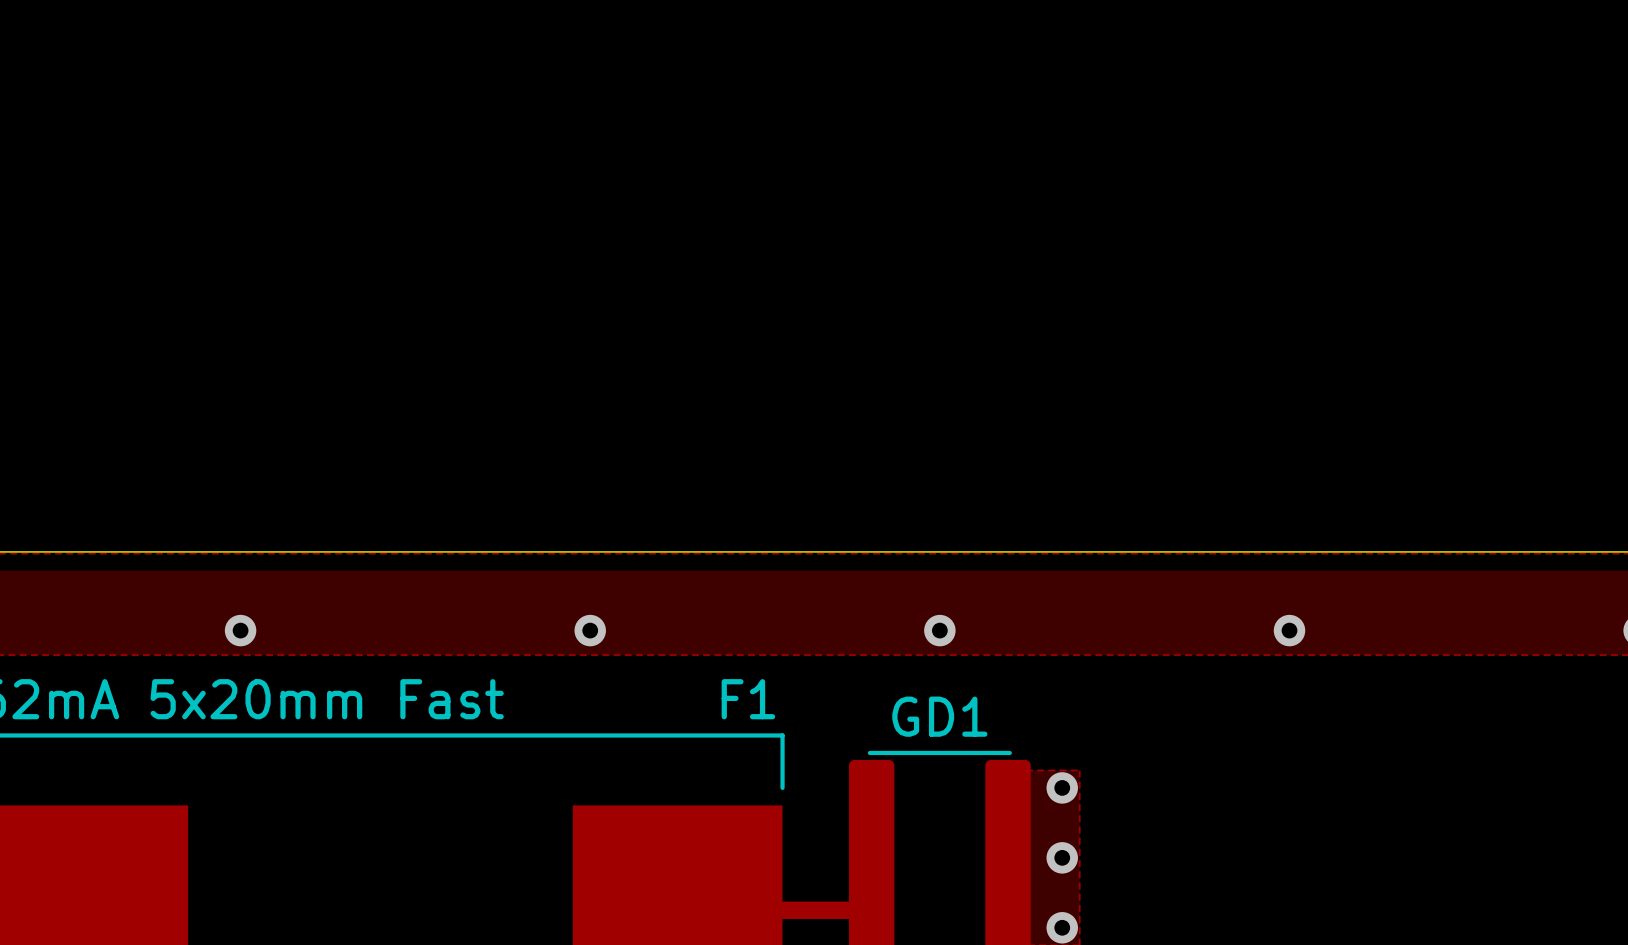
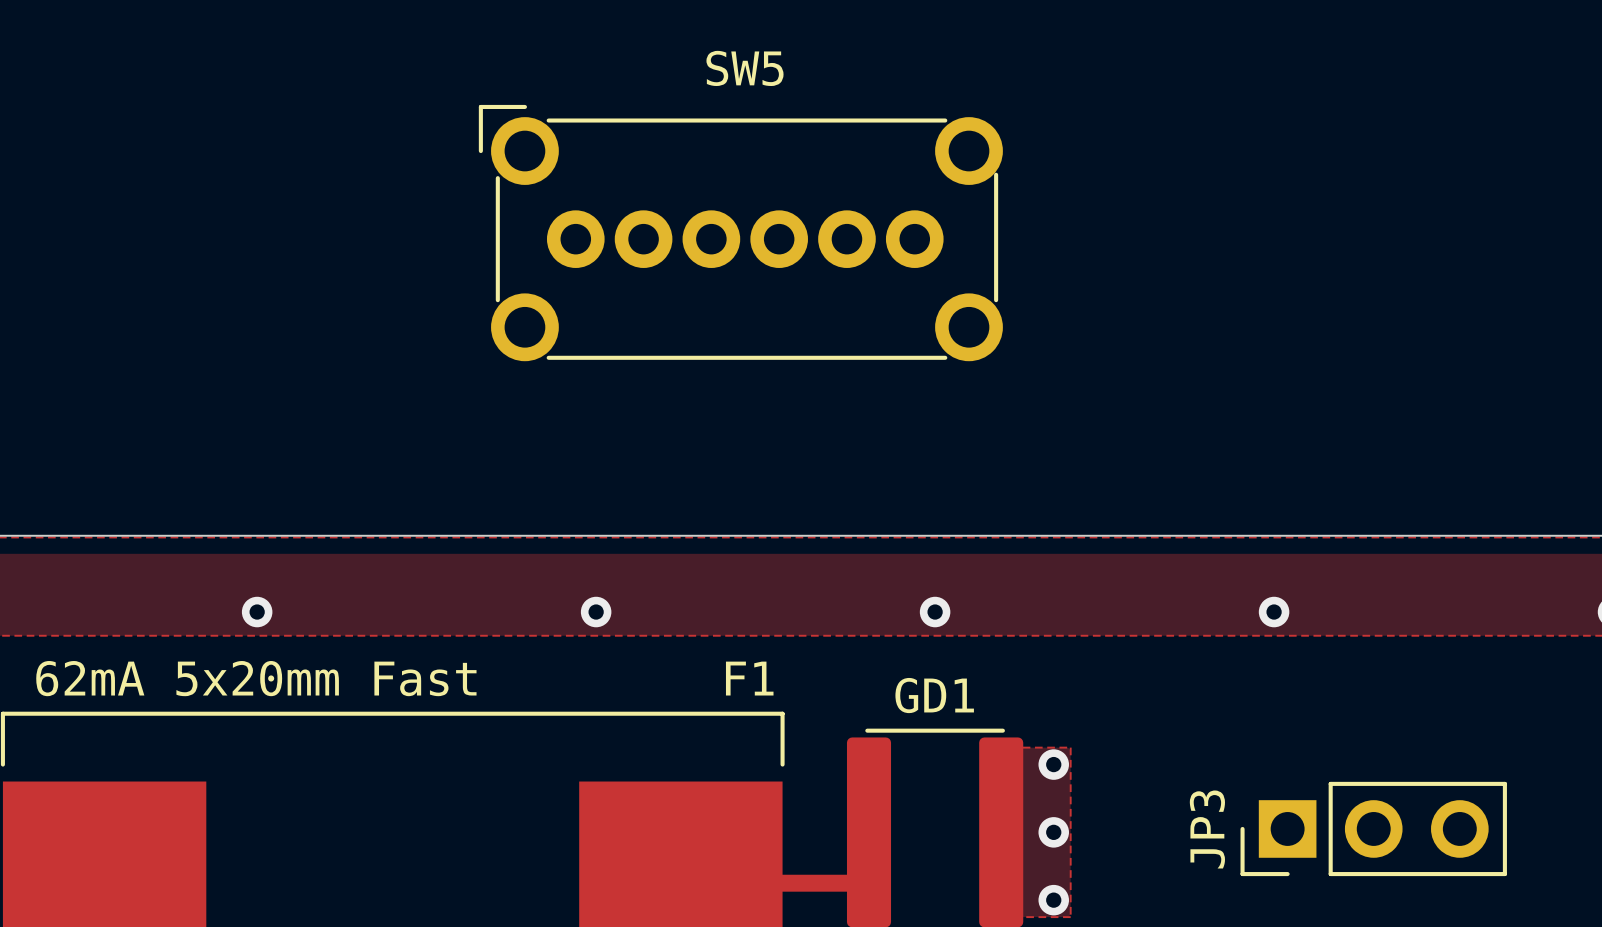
SW5: none -> (740, 233)
JP3: none -> (1373, 828)

